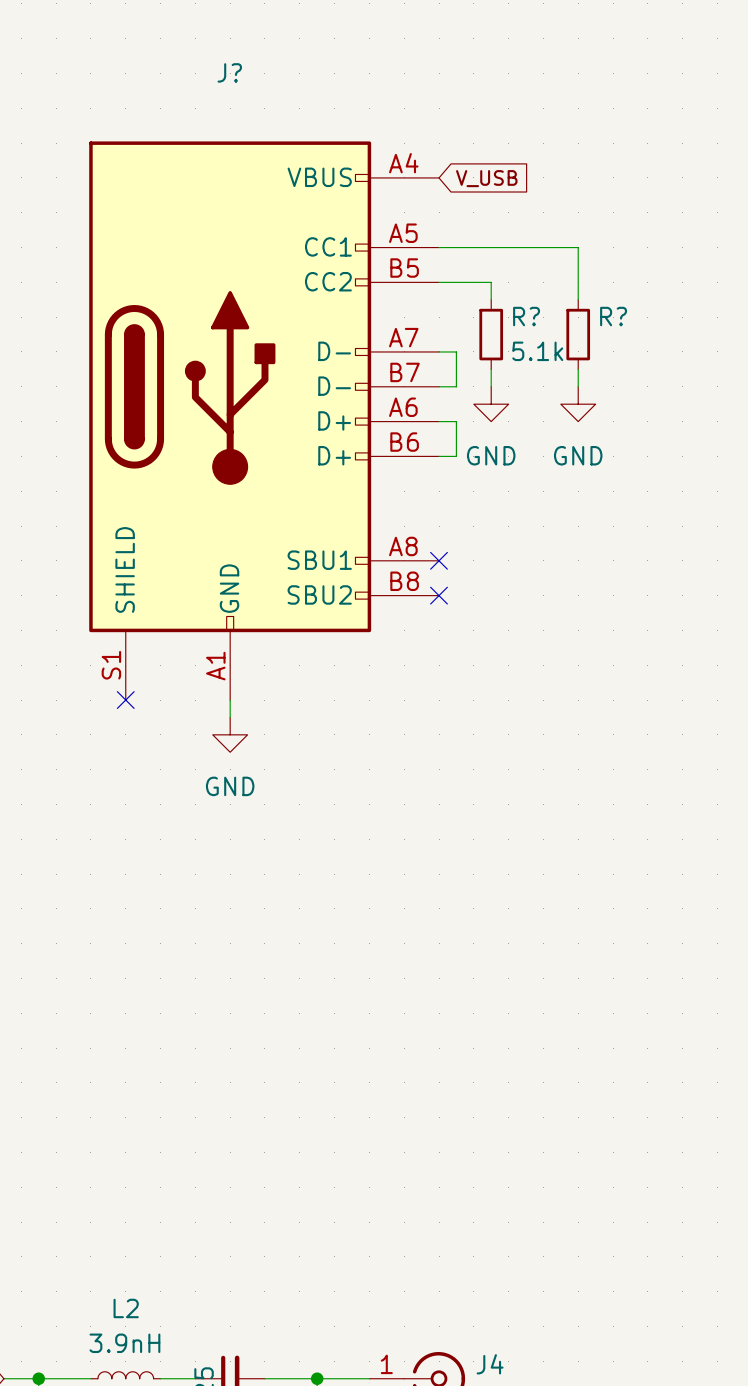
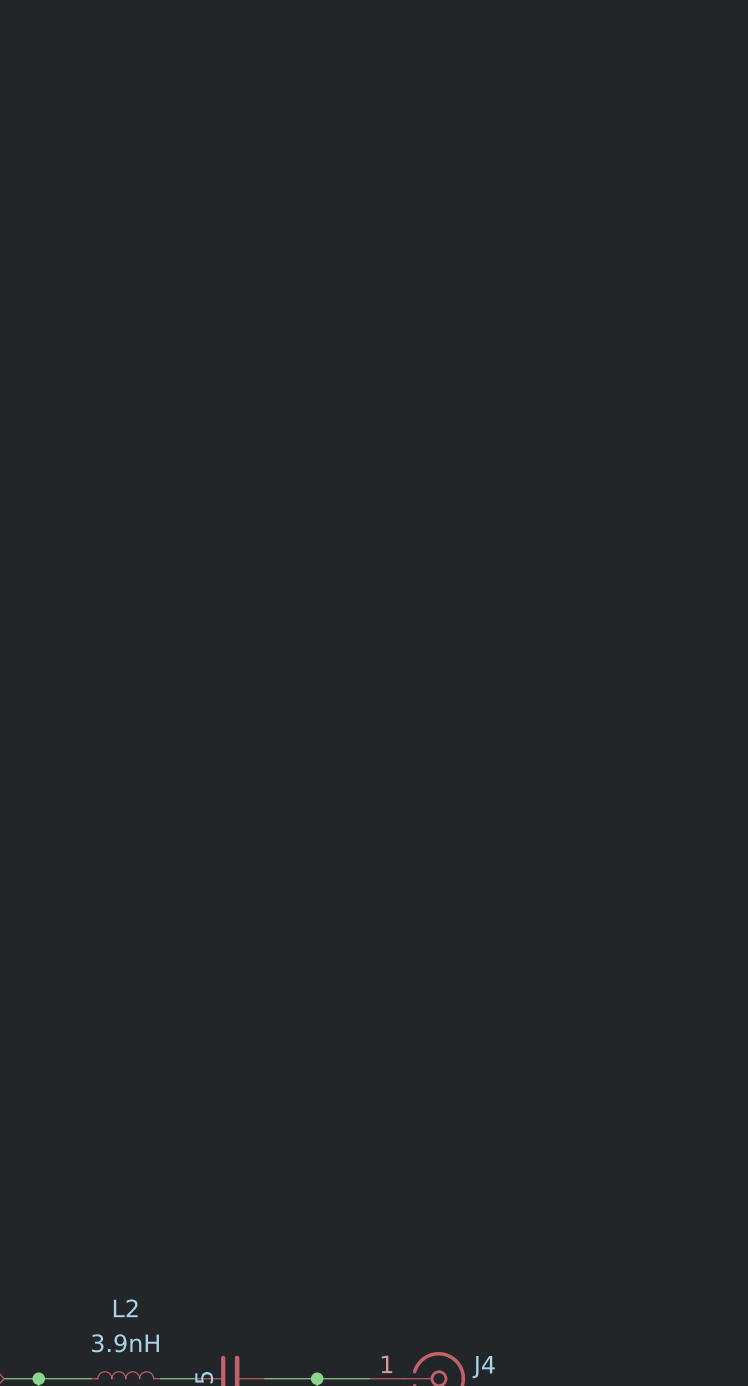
global label: V_USB (486, 178) -> none
wire: (439, 247) (578, 247) (578, 299) -> none
wire: (439, 282) (491, 282) (491, 299) -> none
R?: 5.1k (491, 334) -> none
R?: (578, 334) -> none
wire: (439, 351) (456, 351) (456, 386) (439, 386) -> none
wire: (491, 369) (491, 386) -> none
wire: (578, 369) (578, 386) -> none
power symbol: GND (491, 404) -> none
power symbol: GND (578, 404) -> none
J?: (264, 420) -> none
wire: (439, 421) (456, 421) (456, 456) (439, 456) -> none
no-connect mark: (439, 560) -> none
no-connect mark: (439, 595) -> none
no-connect mark: (125, 700) -> none
wire: (230, 700) (230, 717) -> none
power symbol: GND (230, 734) -> none

